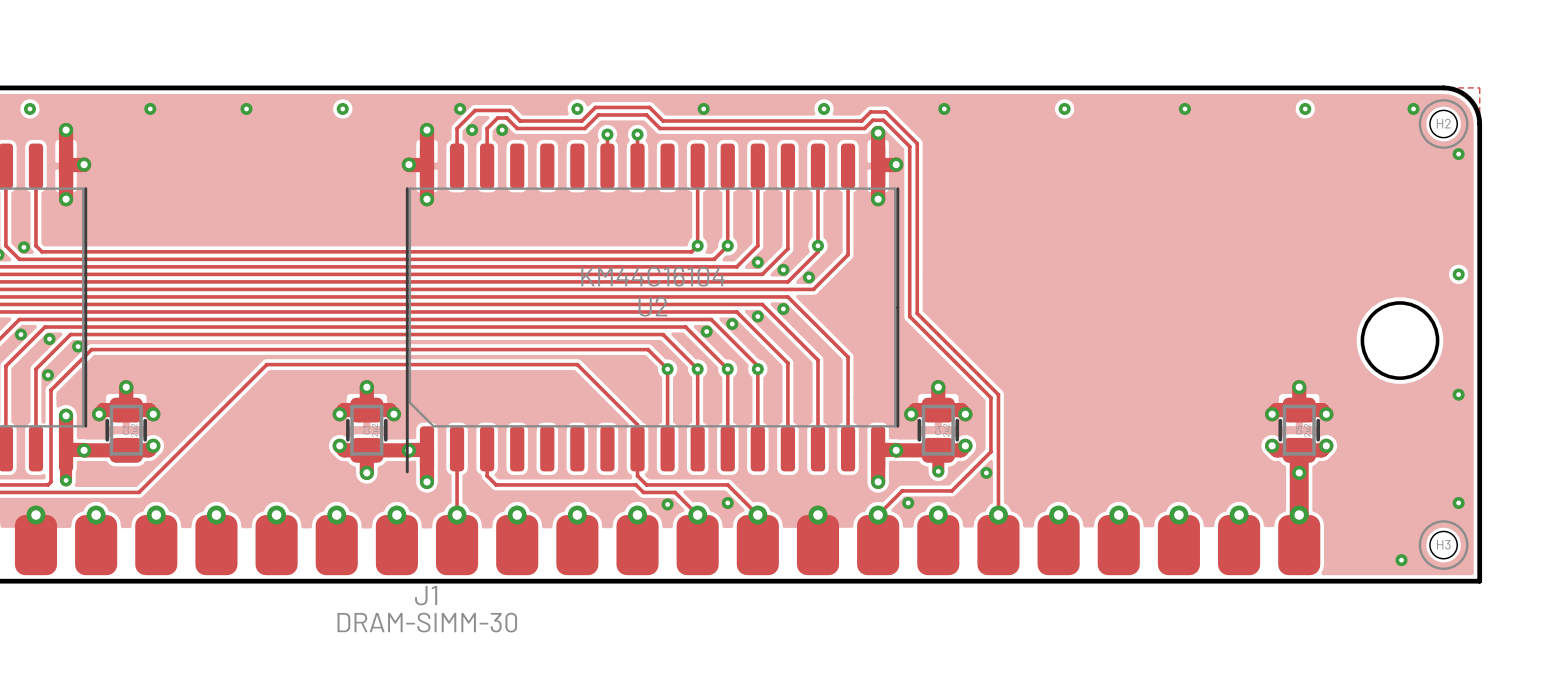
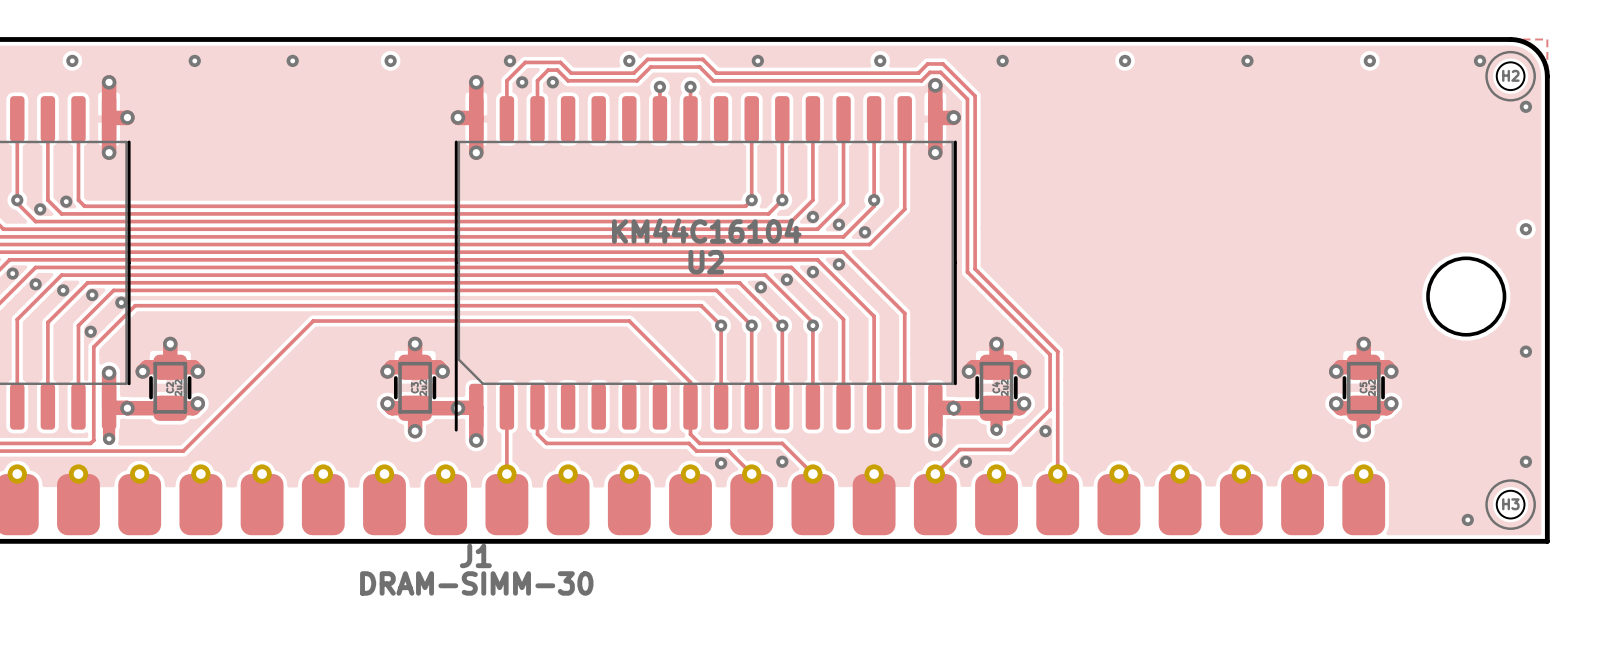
track: (1299, 450) (1299, 515) -> none

